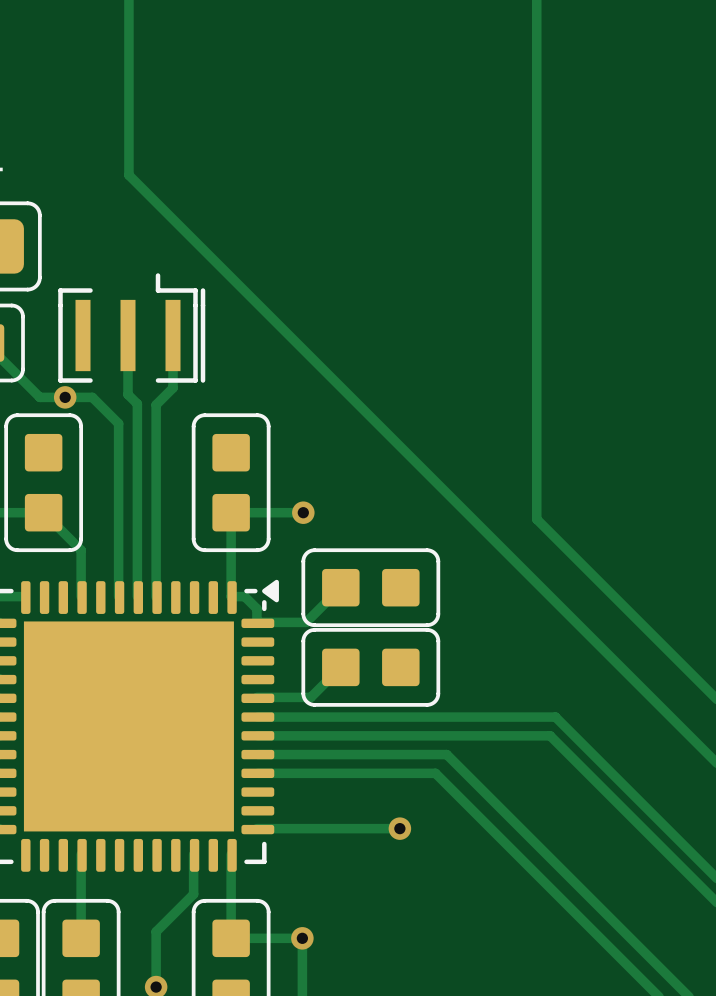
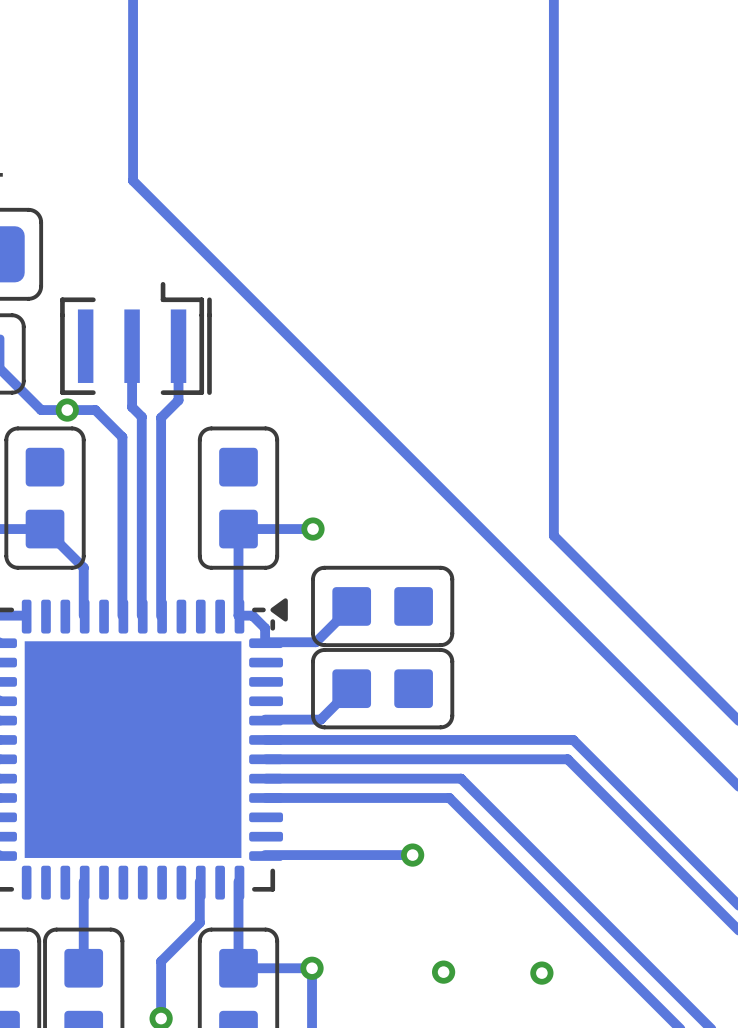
via: none -> (443, 972)
via: none -> (541, 973)

